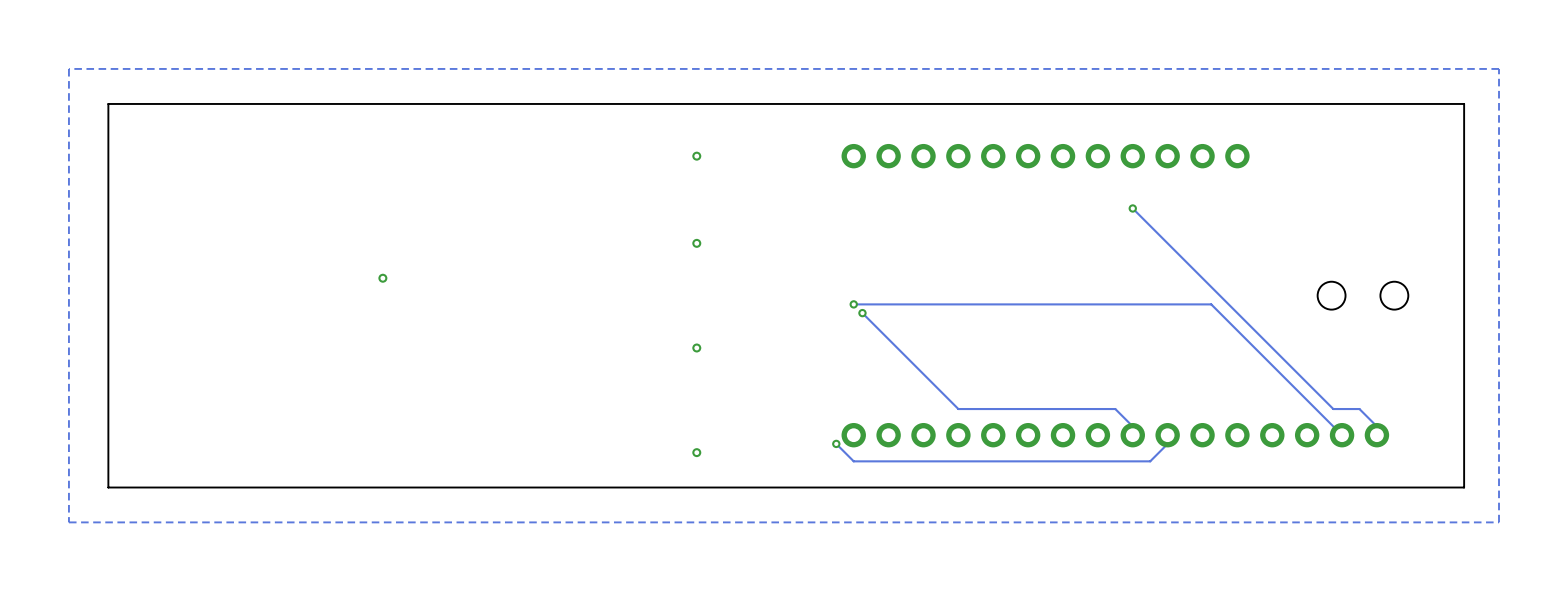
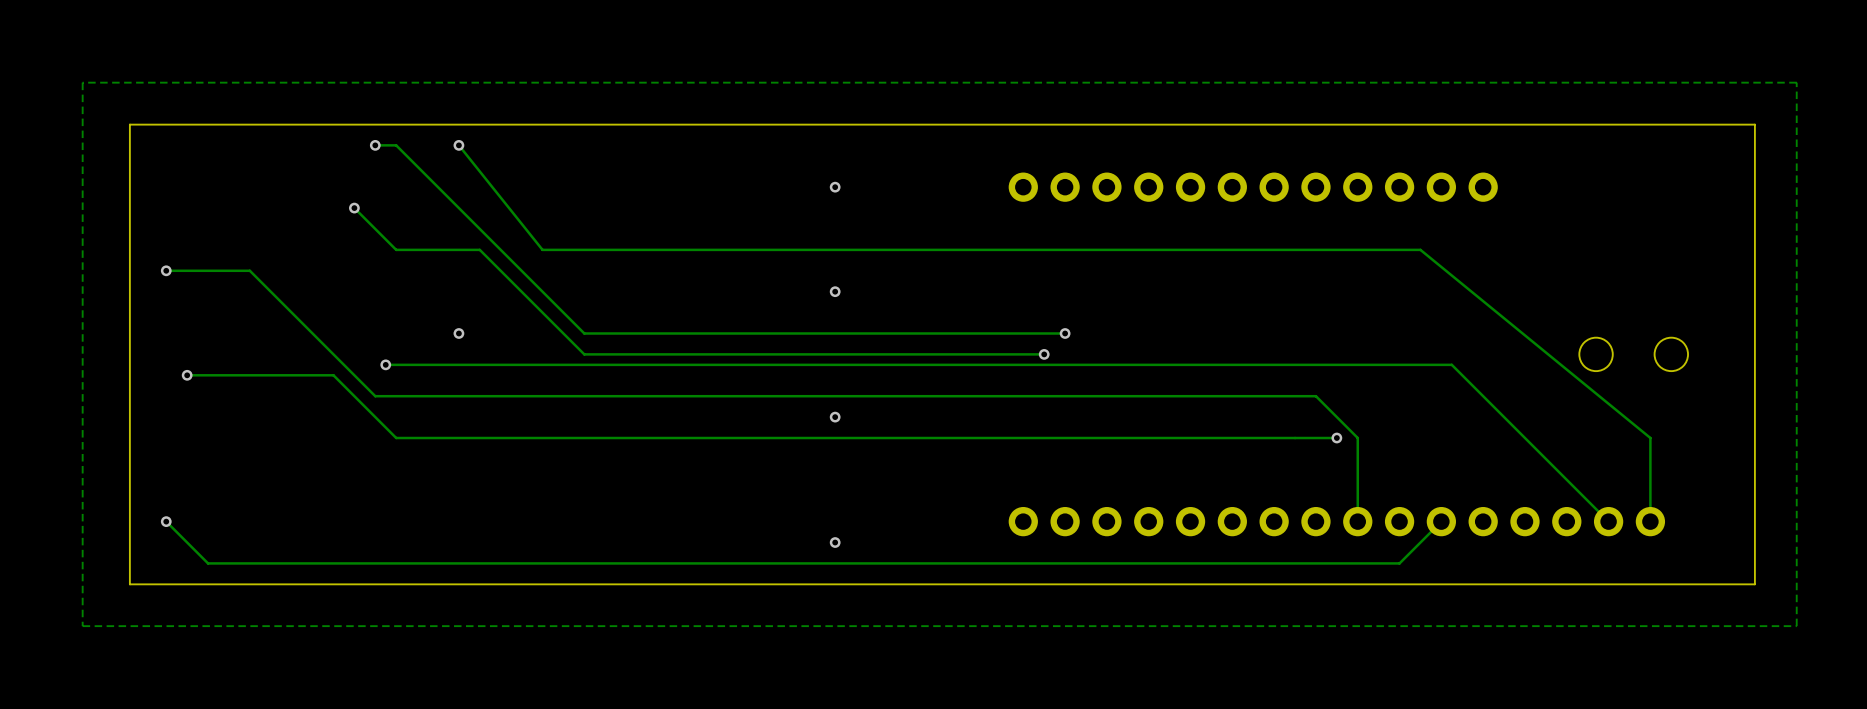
track: none -> (375, 145) (396, 145) (584, 333) (1065, 333)
via: none -> (375, 145)
via: none -> (458, 145)
track: none -> (354, 208) (396, 249) (479, 249) (584, 354) (1044, 354)
via: none -> (354, 208)
track: (1132, 208) (1333, 409) (1359, 409) (1376, 426) -> (458, 145) (542, 249) (1420, 249) (1650, 438) (1650, 511)
via: (1132, 208) -> none
via: none -> (166, 270)
via: none -> (1065, 333)
via: none -> (1044, 354)
via: none -> (385, 364)
track: none -> (1023, 364) (385, 364)
via: (853, 304) -> none
track: none -> (187, 375) (333, 375) (396, 438) (1336, 438)
via: none -> (187, 375)
track: (862, 313) (958, 409) (1115, 409) (1132, 426) -> (166, 270) (249, 270) (375, 396) (1315, 396) (1357, 438) (1357, 511)
via: (862, 313) -> none
via: none -> (1336, 438)
via: none -> (166, 521)
track: (1167, 435) (1167, 443) (1150, 461) (853, 461) (836, 443) -> none
track: none -> (1441, 521) (1399, 563) (208, 563) (166, 521)
via: (836, 443) -> none

